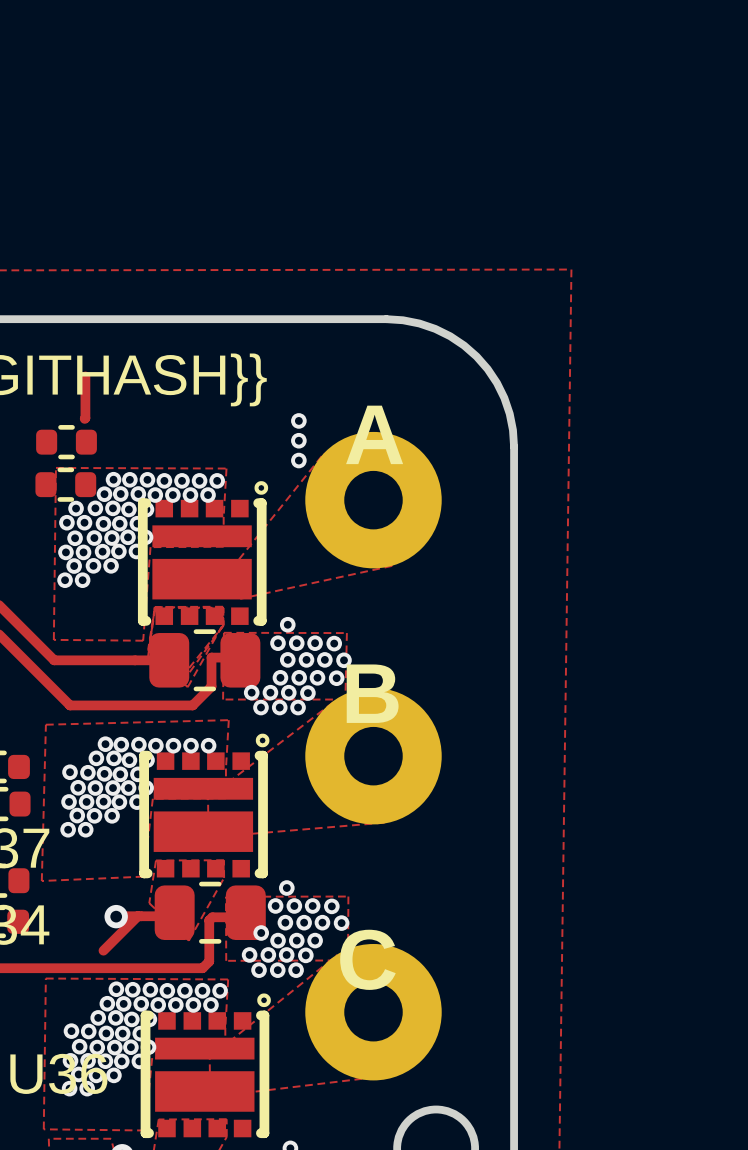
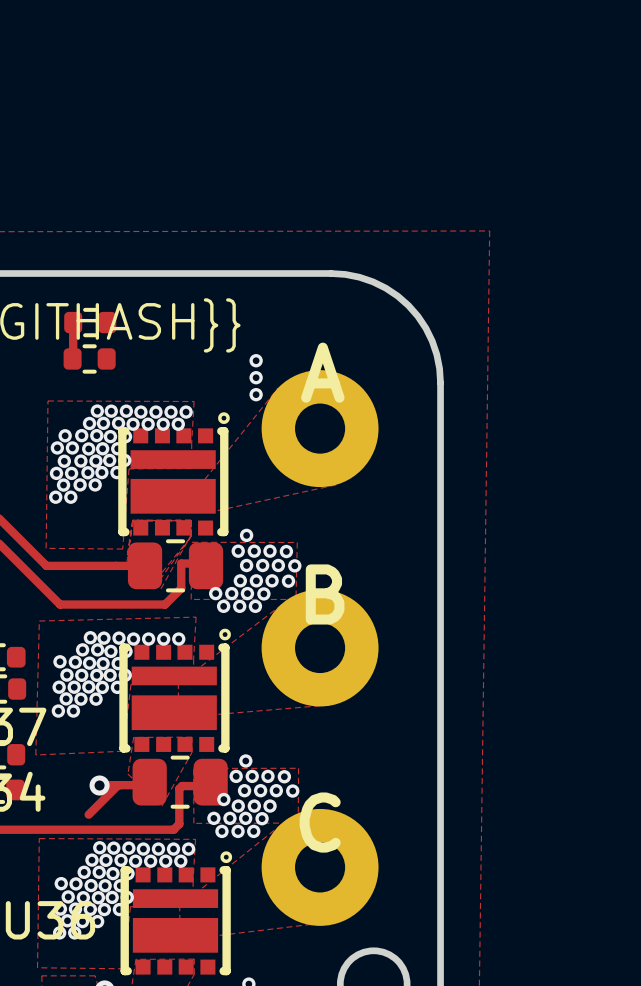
part: none -> (90, 322)
part: none -> (89, 358)
part: (66, 442) -> none
part: (65, 484) -> none

